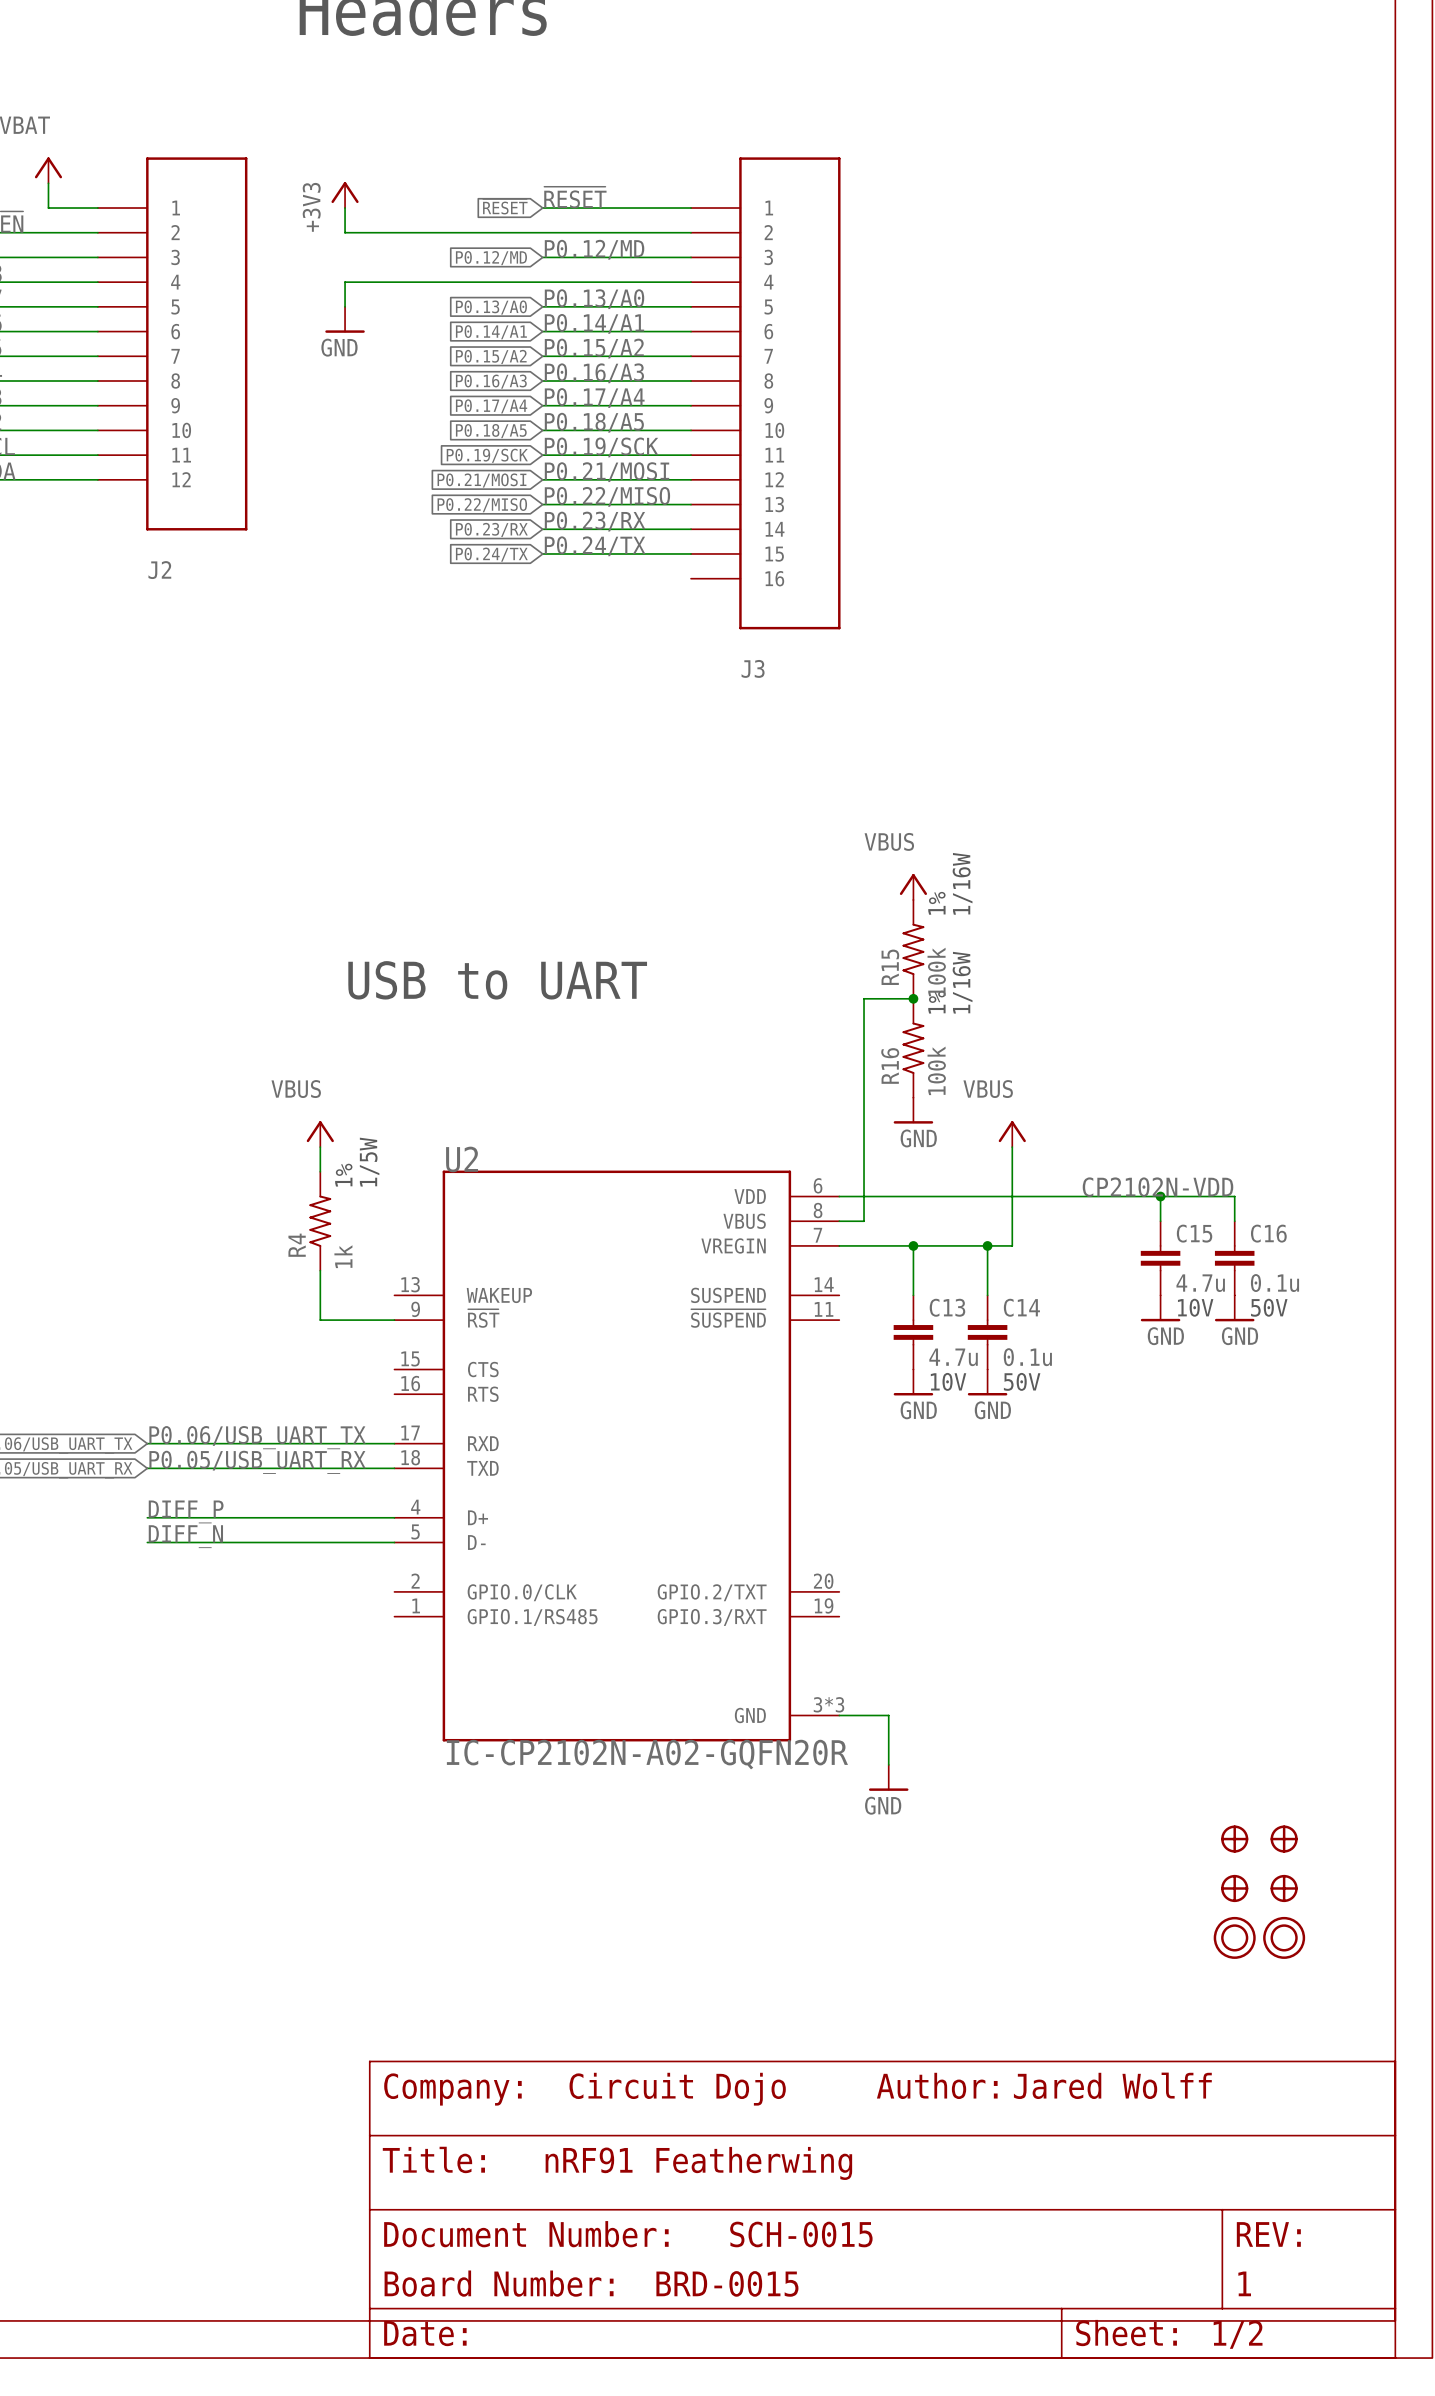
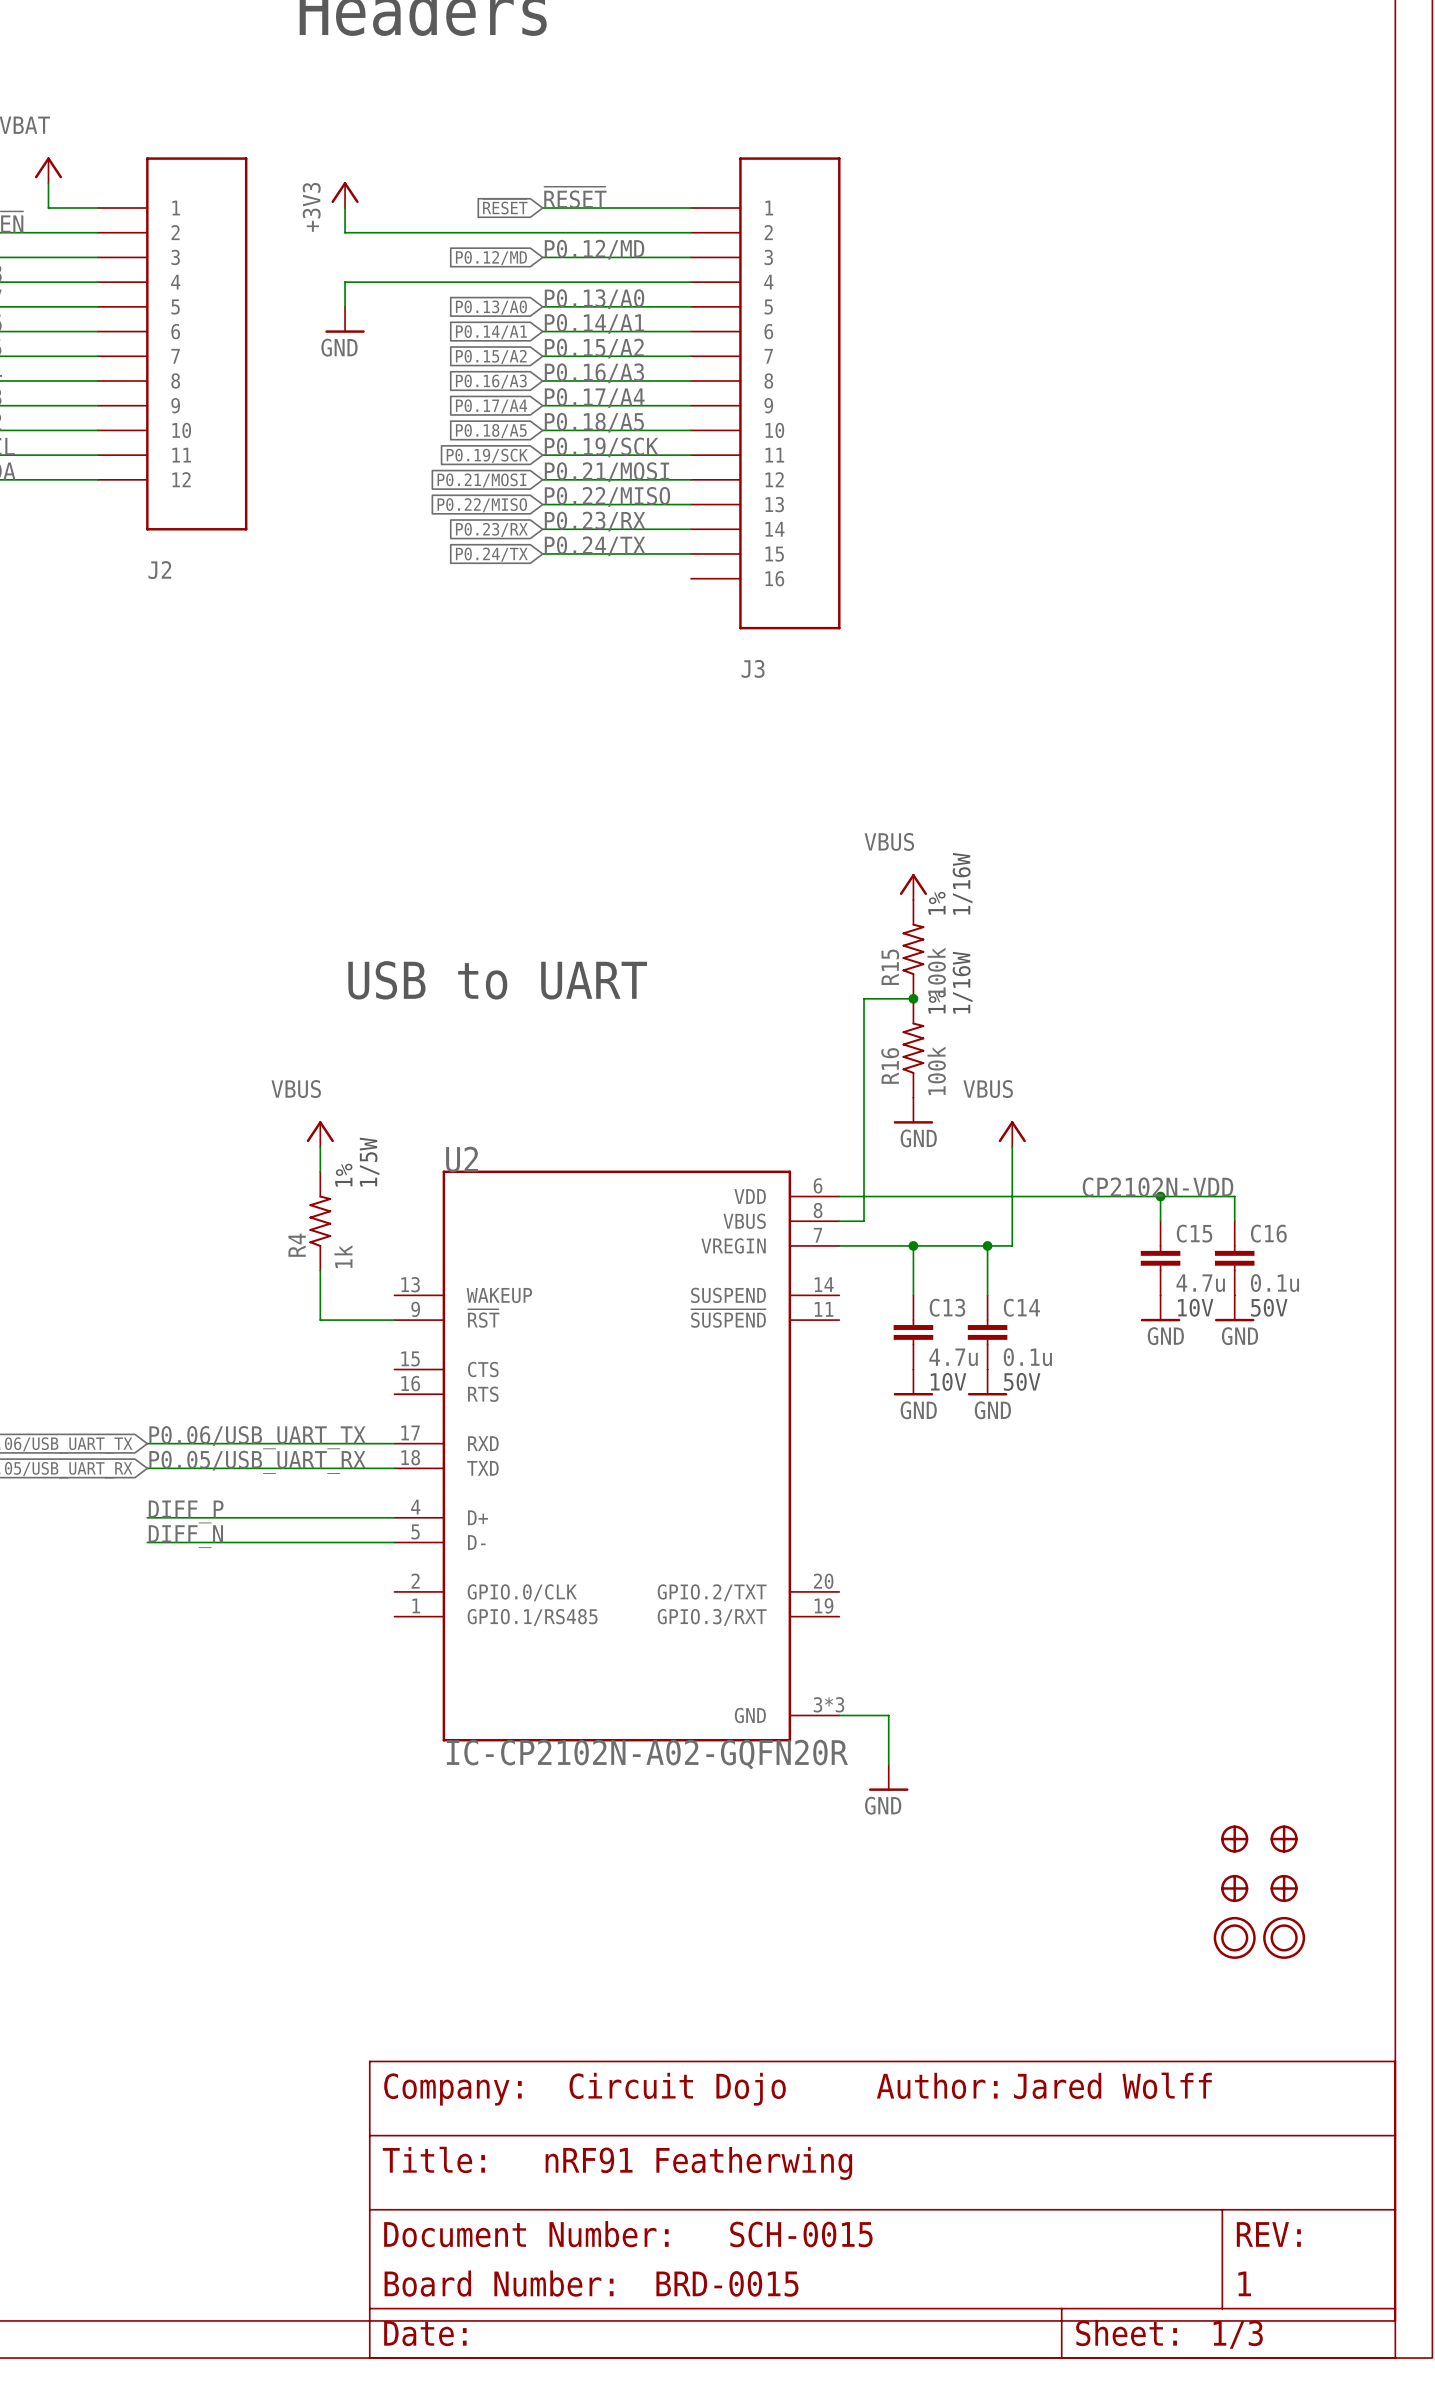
part text: 1/2 (1238, 2334) -> 1/3 (1238, 2334)

